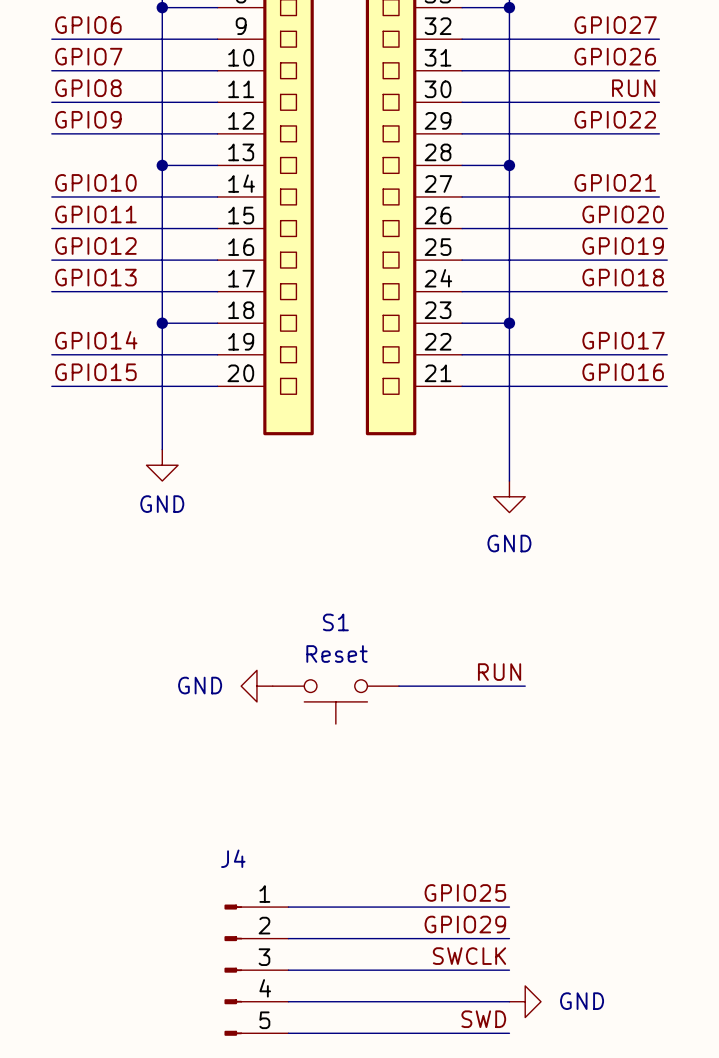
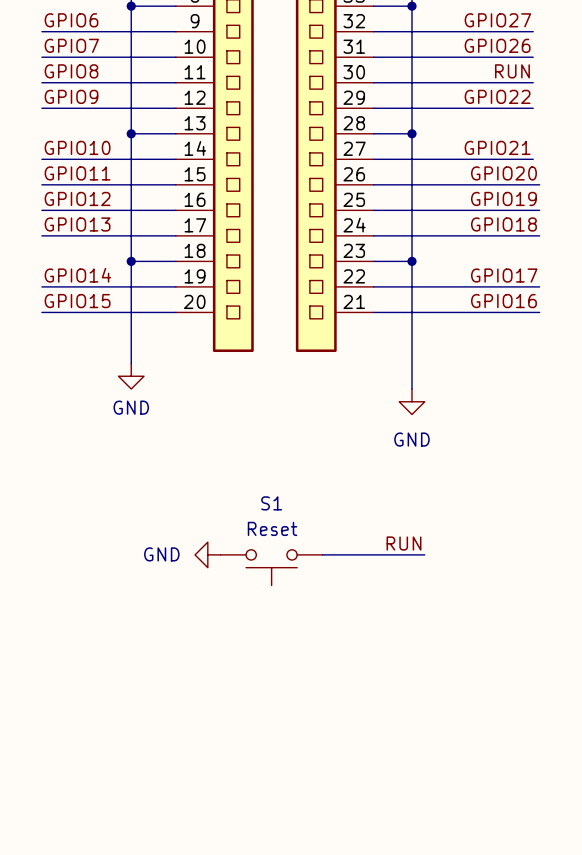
label: GPIO25 (465, 892) -> none
wire: (288, 907) (509, 907) -> none
label: GPIO29 (465, 924) -> none
wire: (288, 938) (509, 938) -> none
label: SWCLK (469, 956) -> none
J4: (256, 970) -> none
wire: (288, 970) (509, 970) -> none
wire: (288, 1001) (509, 1001) -> none
power symbol: GND (525, 1001) -> none
label: SWD (483, 1019) -> none
wire: (288, 1033) (509, 1033) -> none

